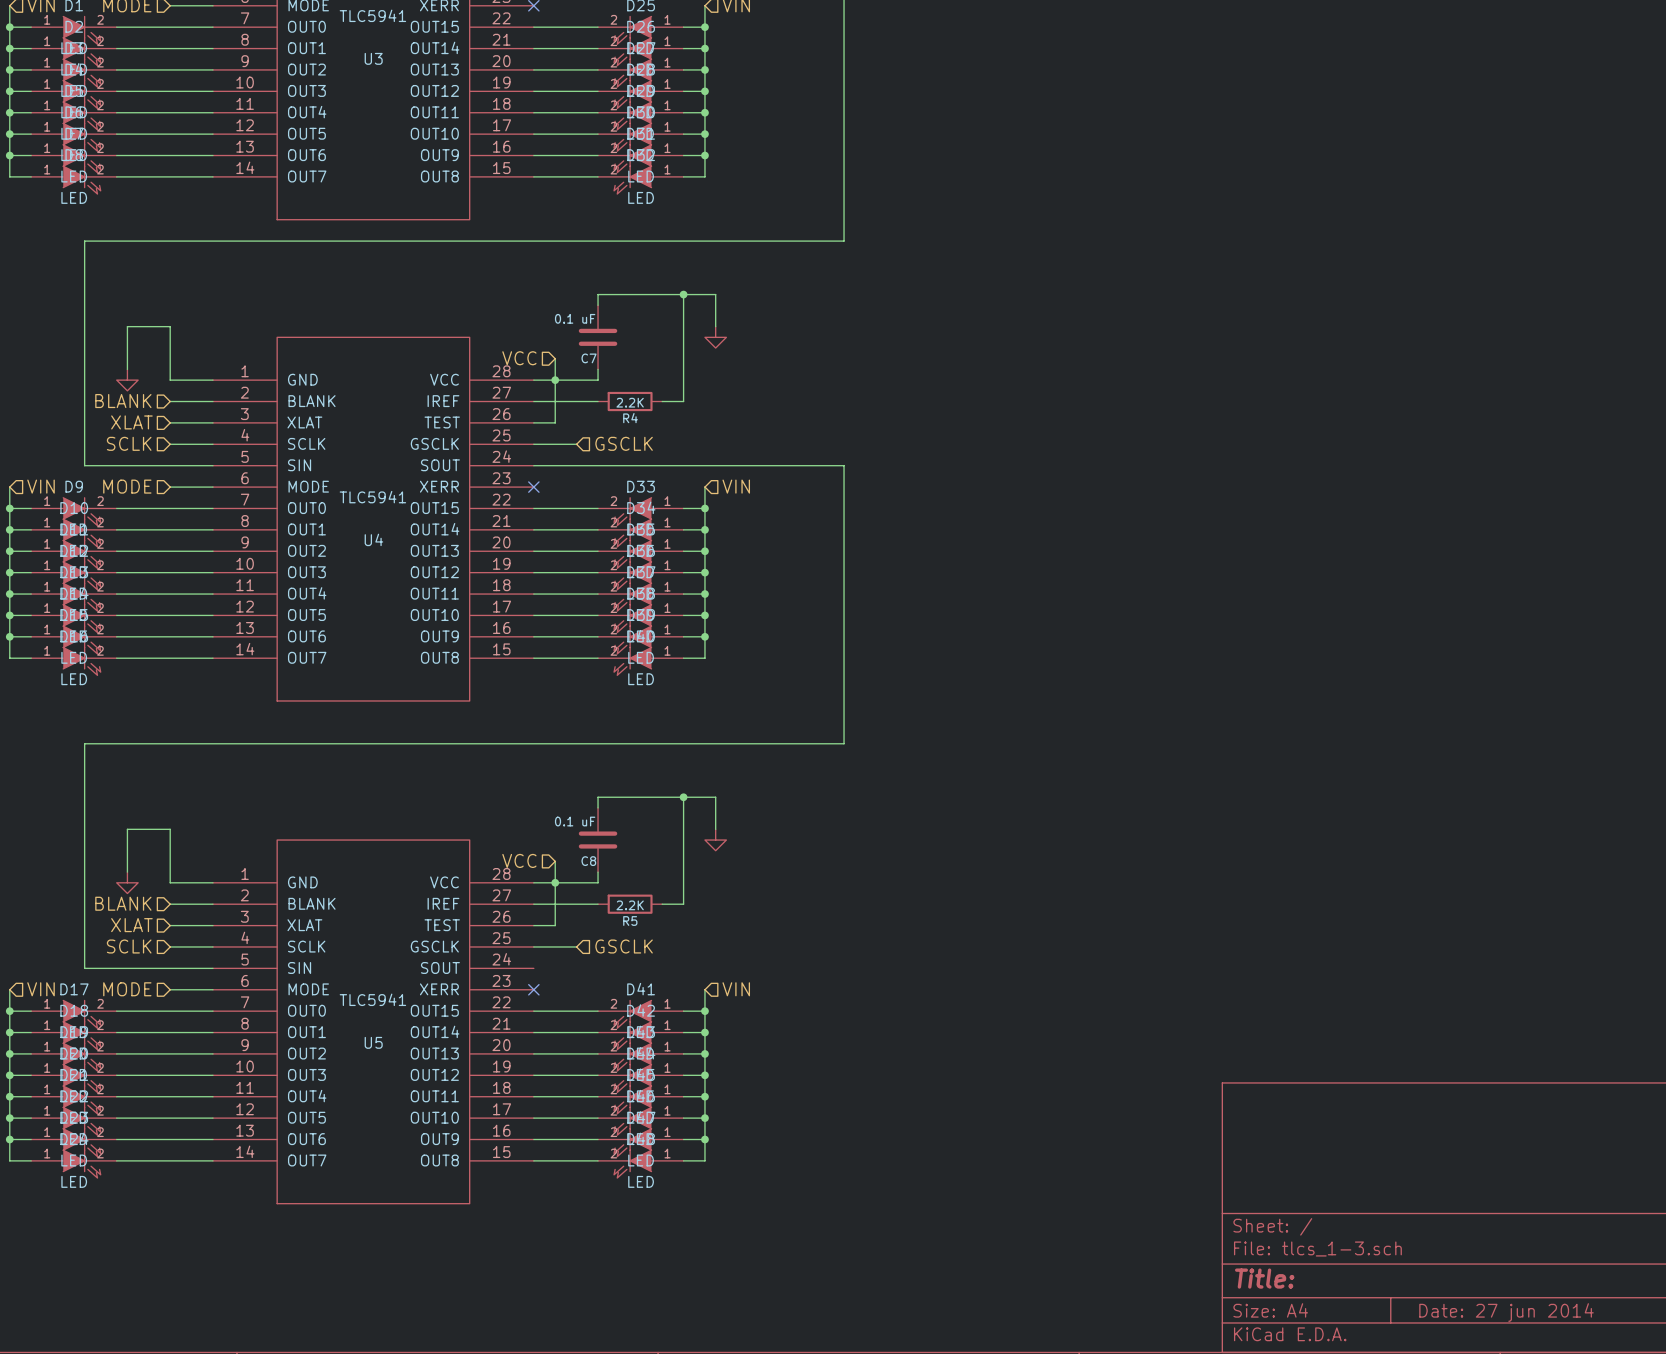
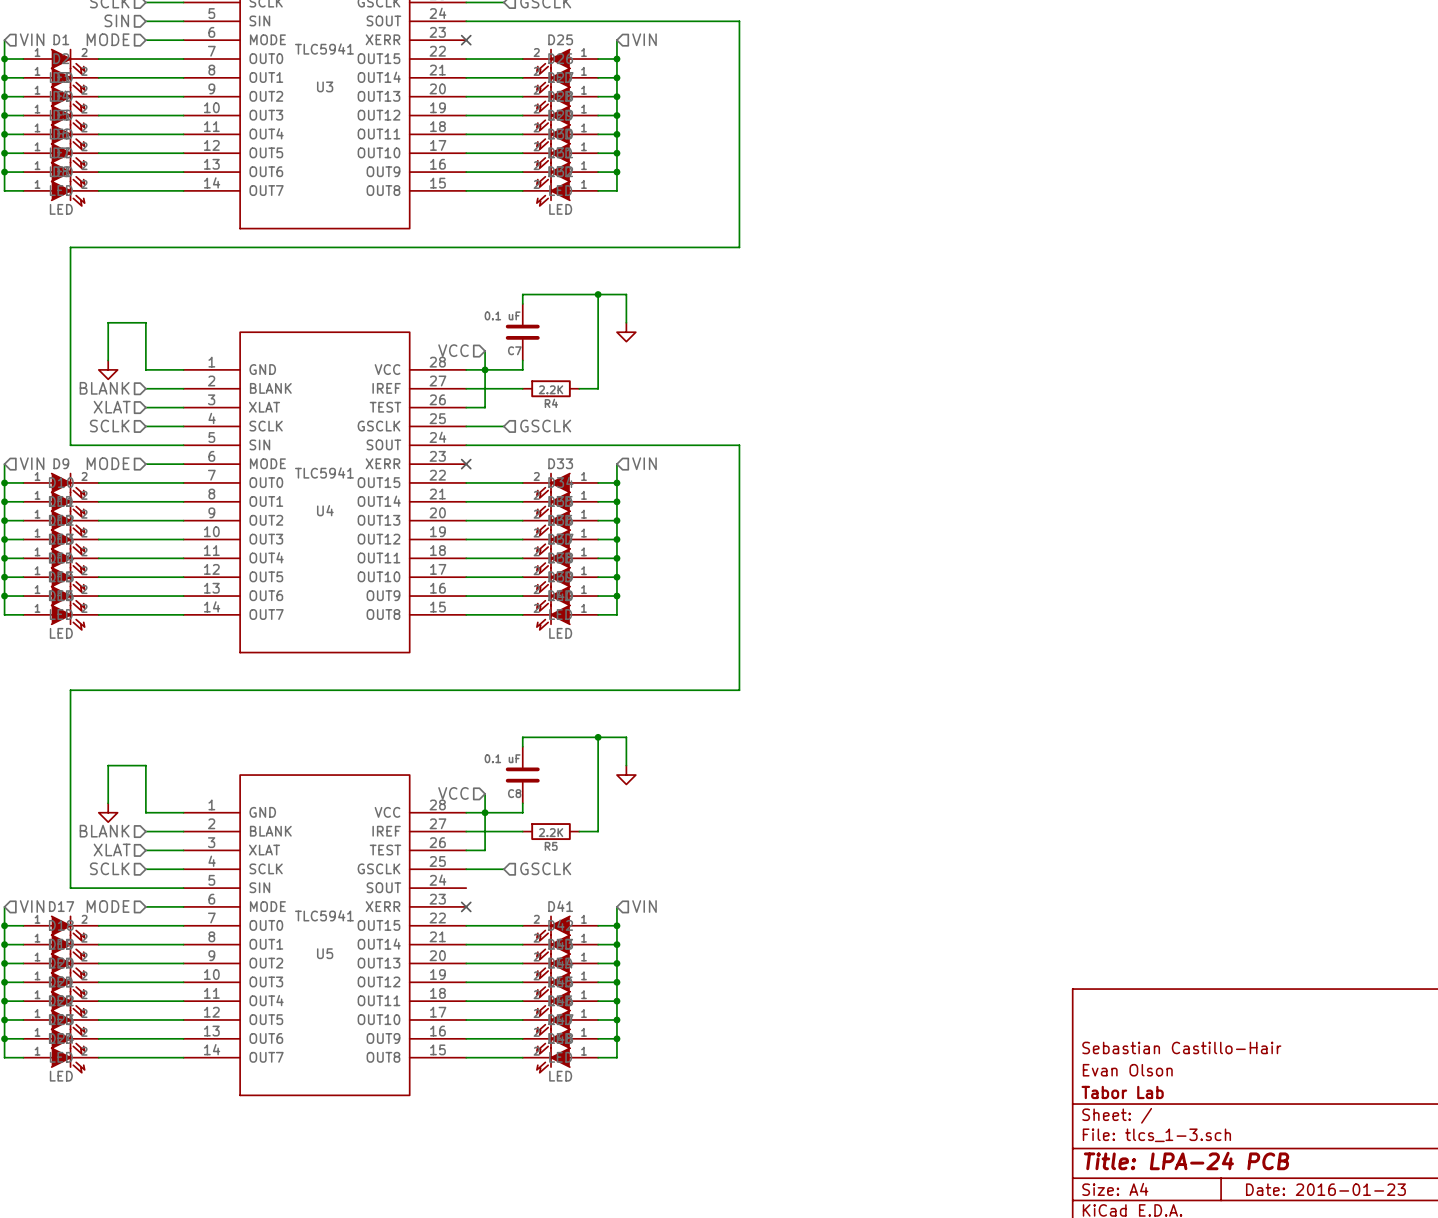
title block: none -> Sebastian Castillo-Hair (1181, 1047)
title block: none -> Evan Olson (1127, 1070)
title block: none -> Tabor Lab (1122, 1092)
title block: Title: (1264, 1278) -> Title: LPA-24 PCB (1186, 1160)
title block: Date: 27 jun 2014 (1506, 1312) -> Date: 2016-01-23 (1325, 1189)

